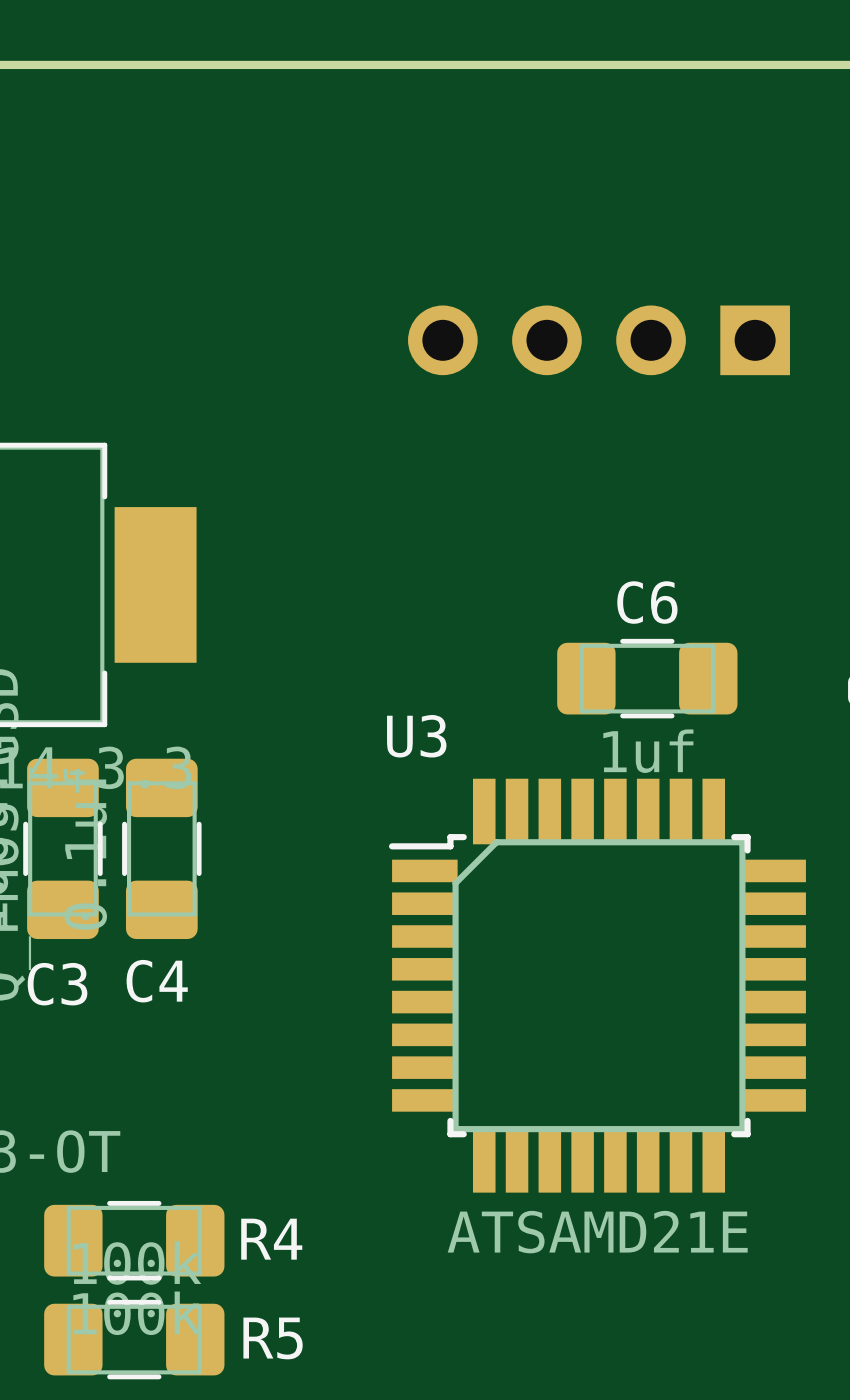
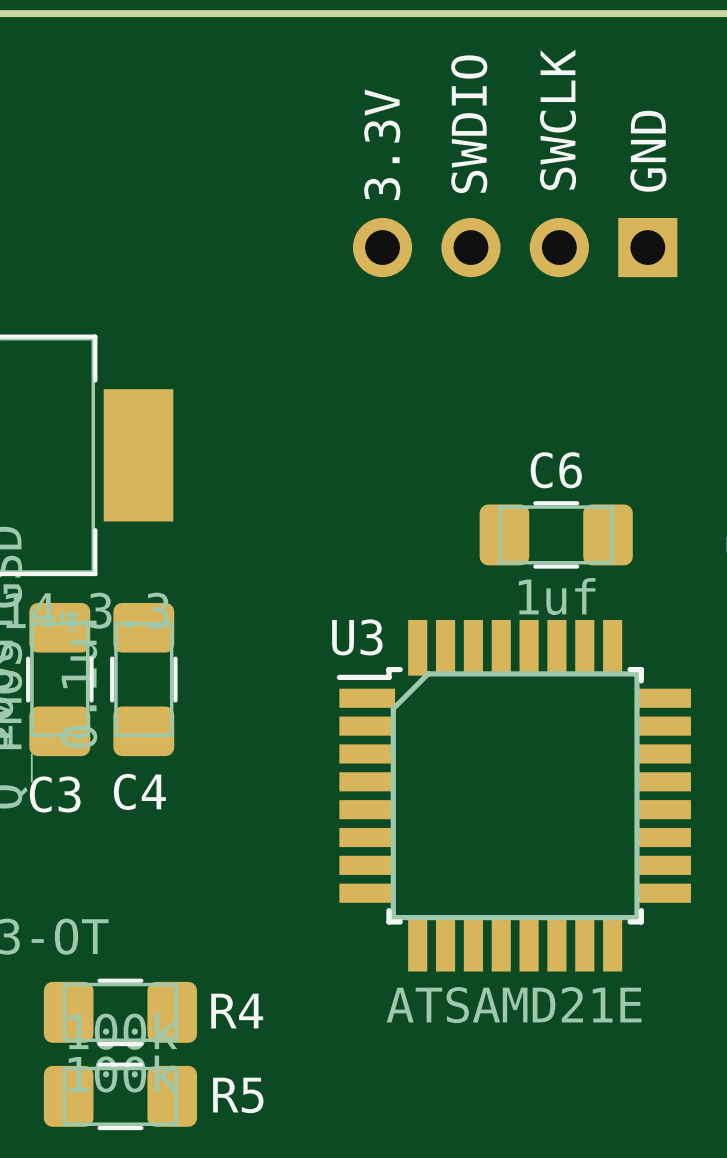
text: none -> SWCLK (558, 119)
text: none -> SWDIO (469, 124)
text: none -> 3.3V (382, 144)
text: none -> GND (648, 151)
U3 name position: U3 (416, 736) -> U3 (357, 637)

